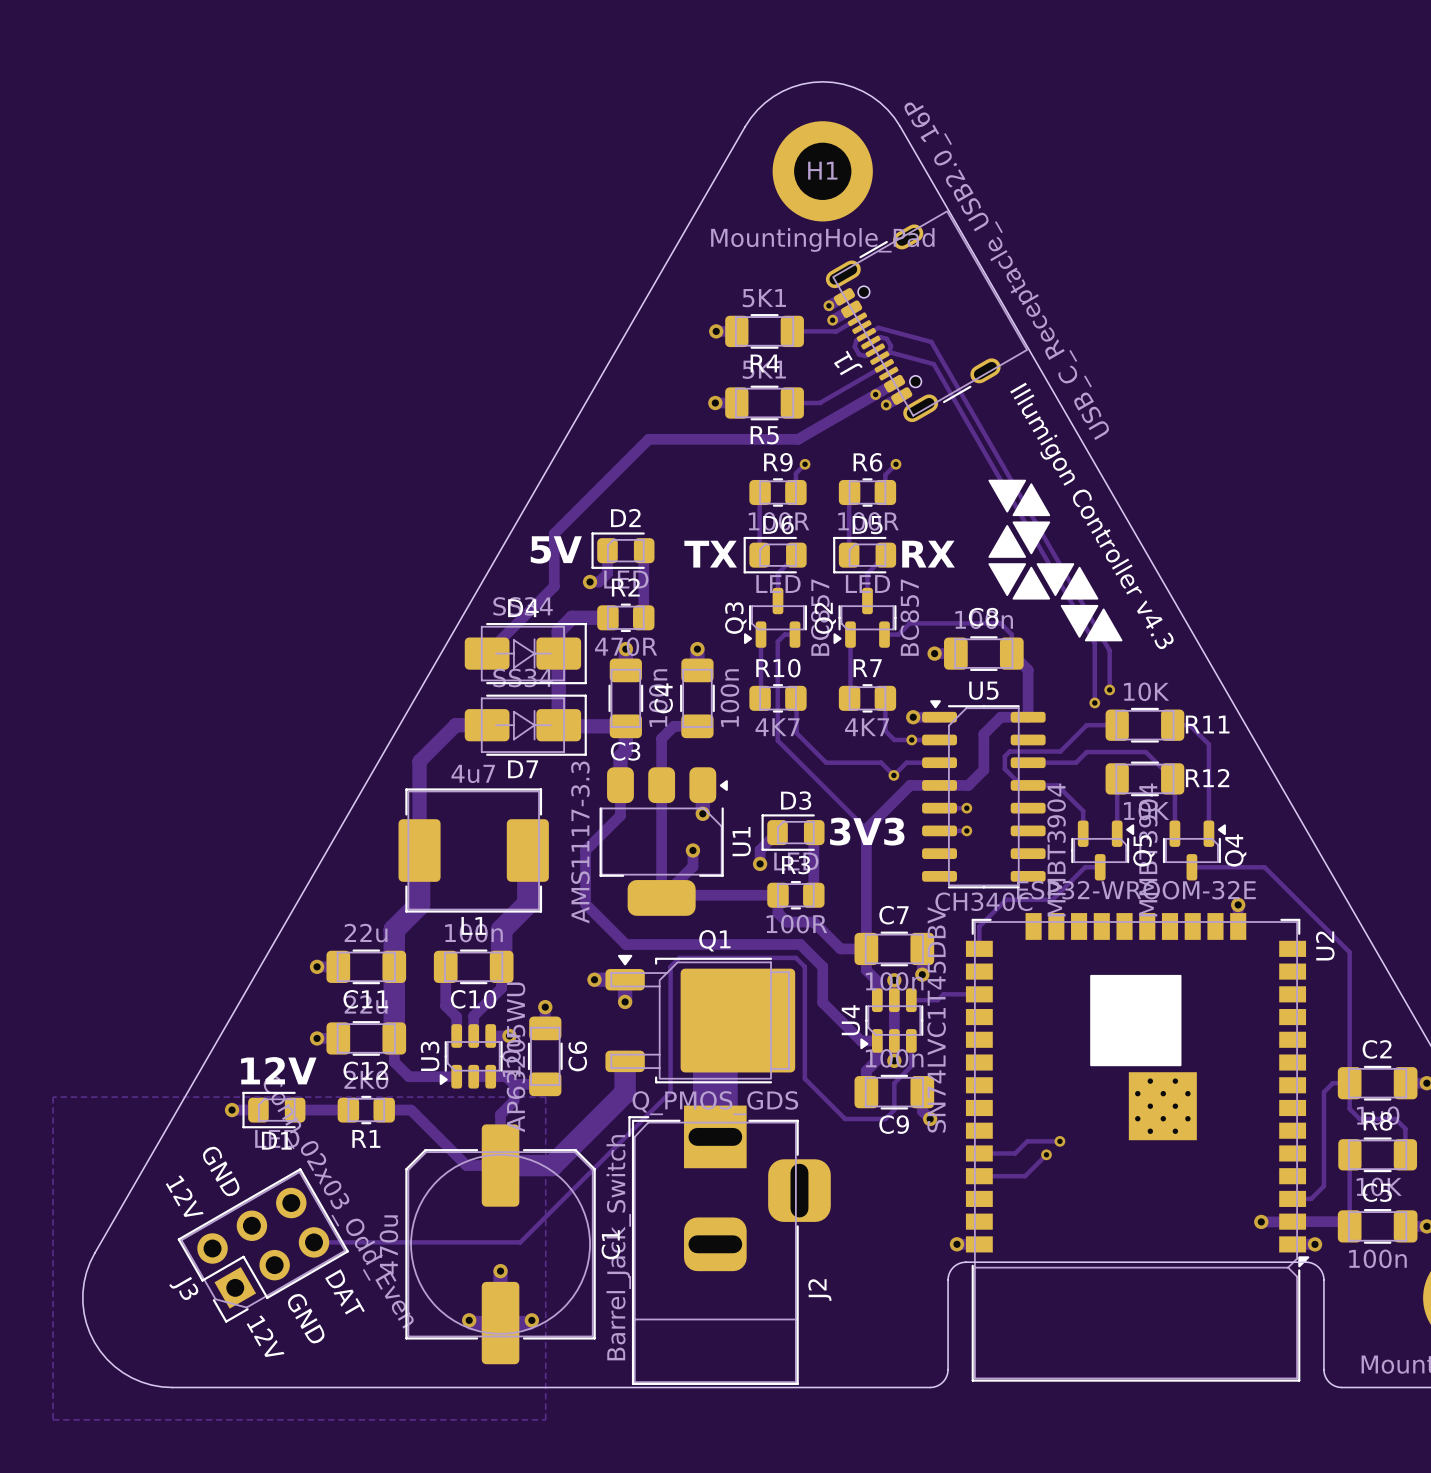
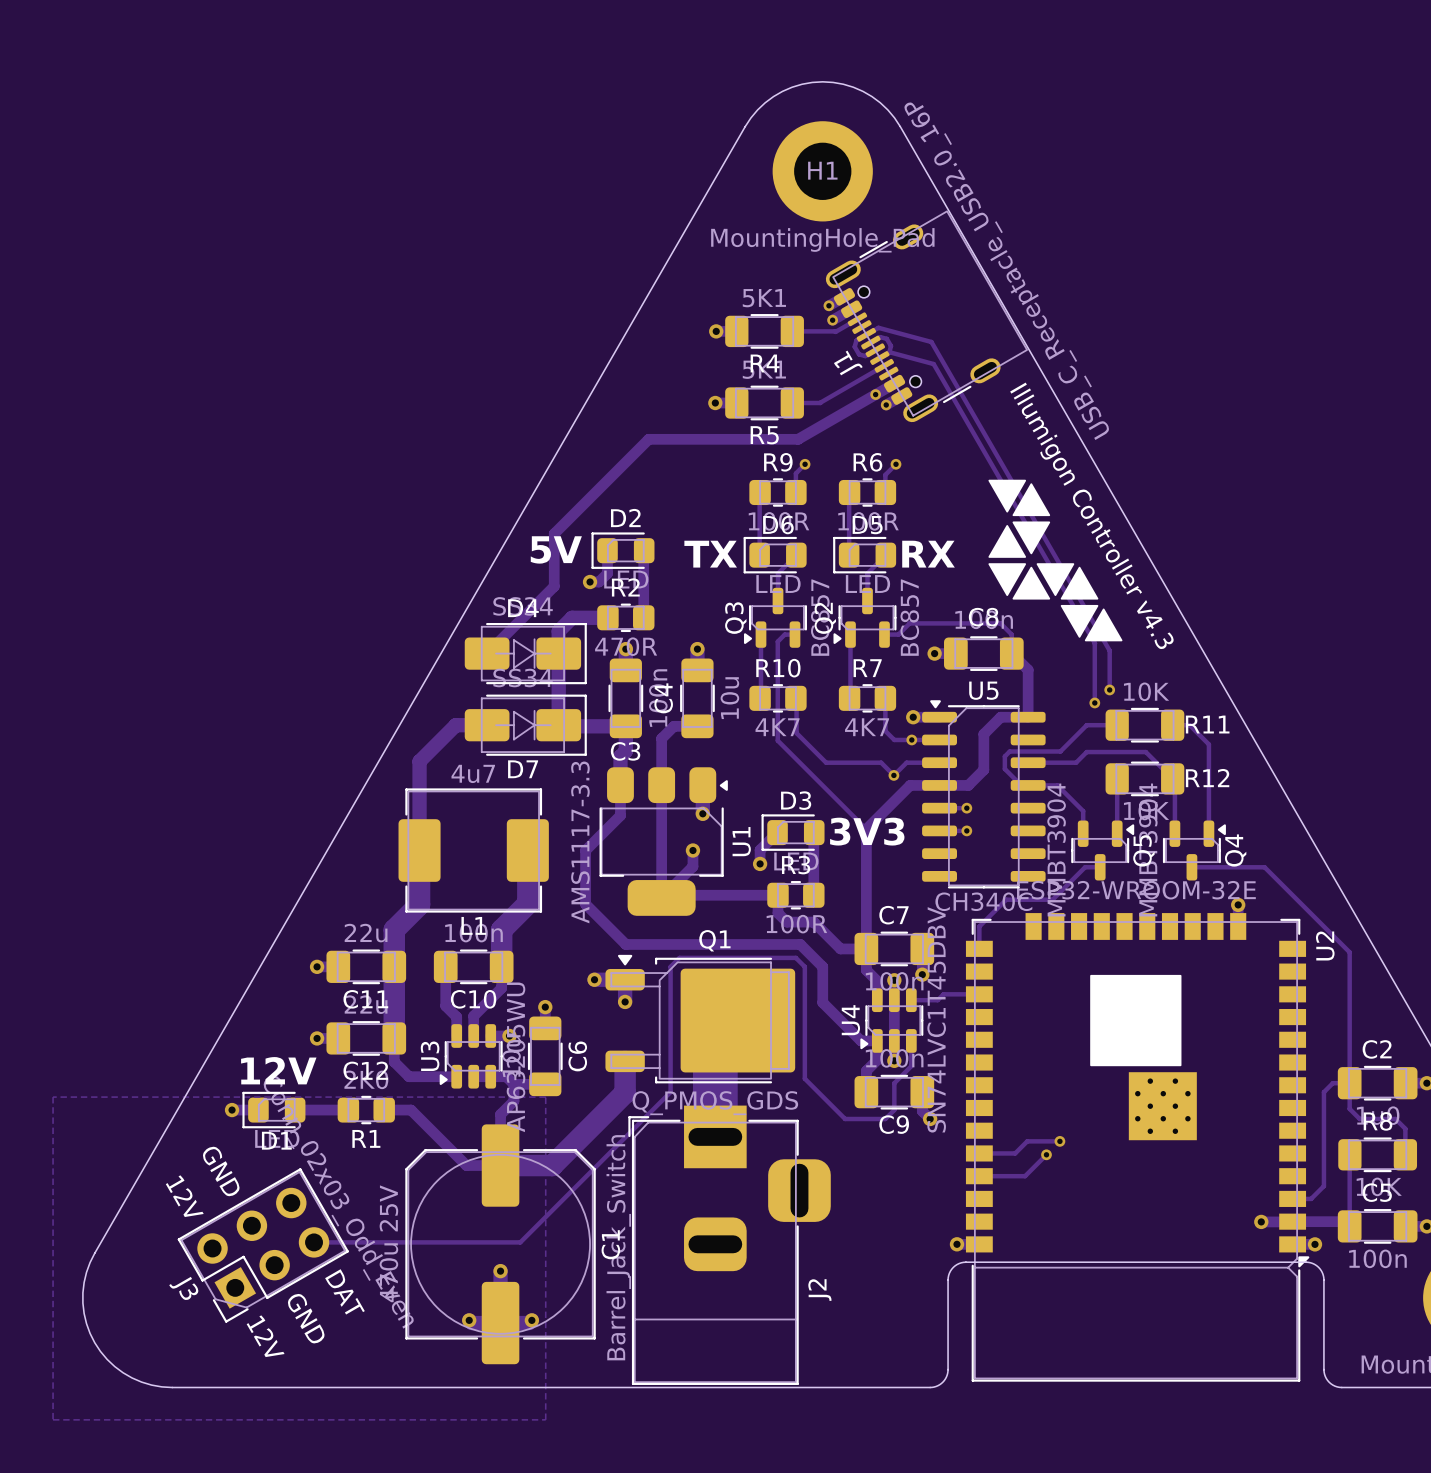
C4 value: 100n (729, 698) -> 10u (729, 698)
C1 value: 470u (388, 1244) -> 470u 25V (388, 1243)

